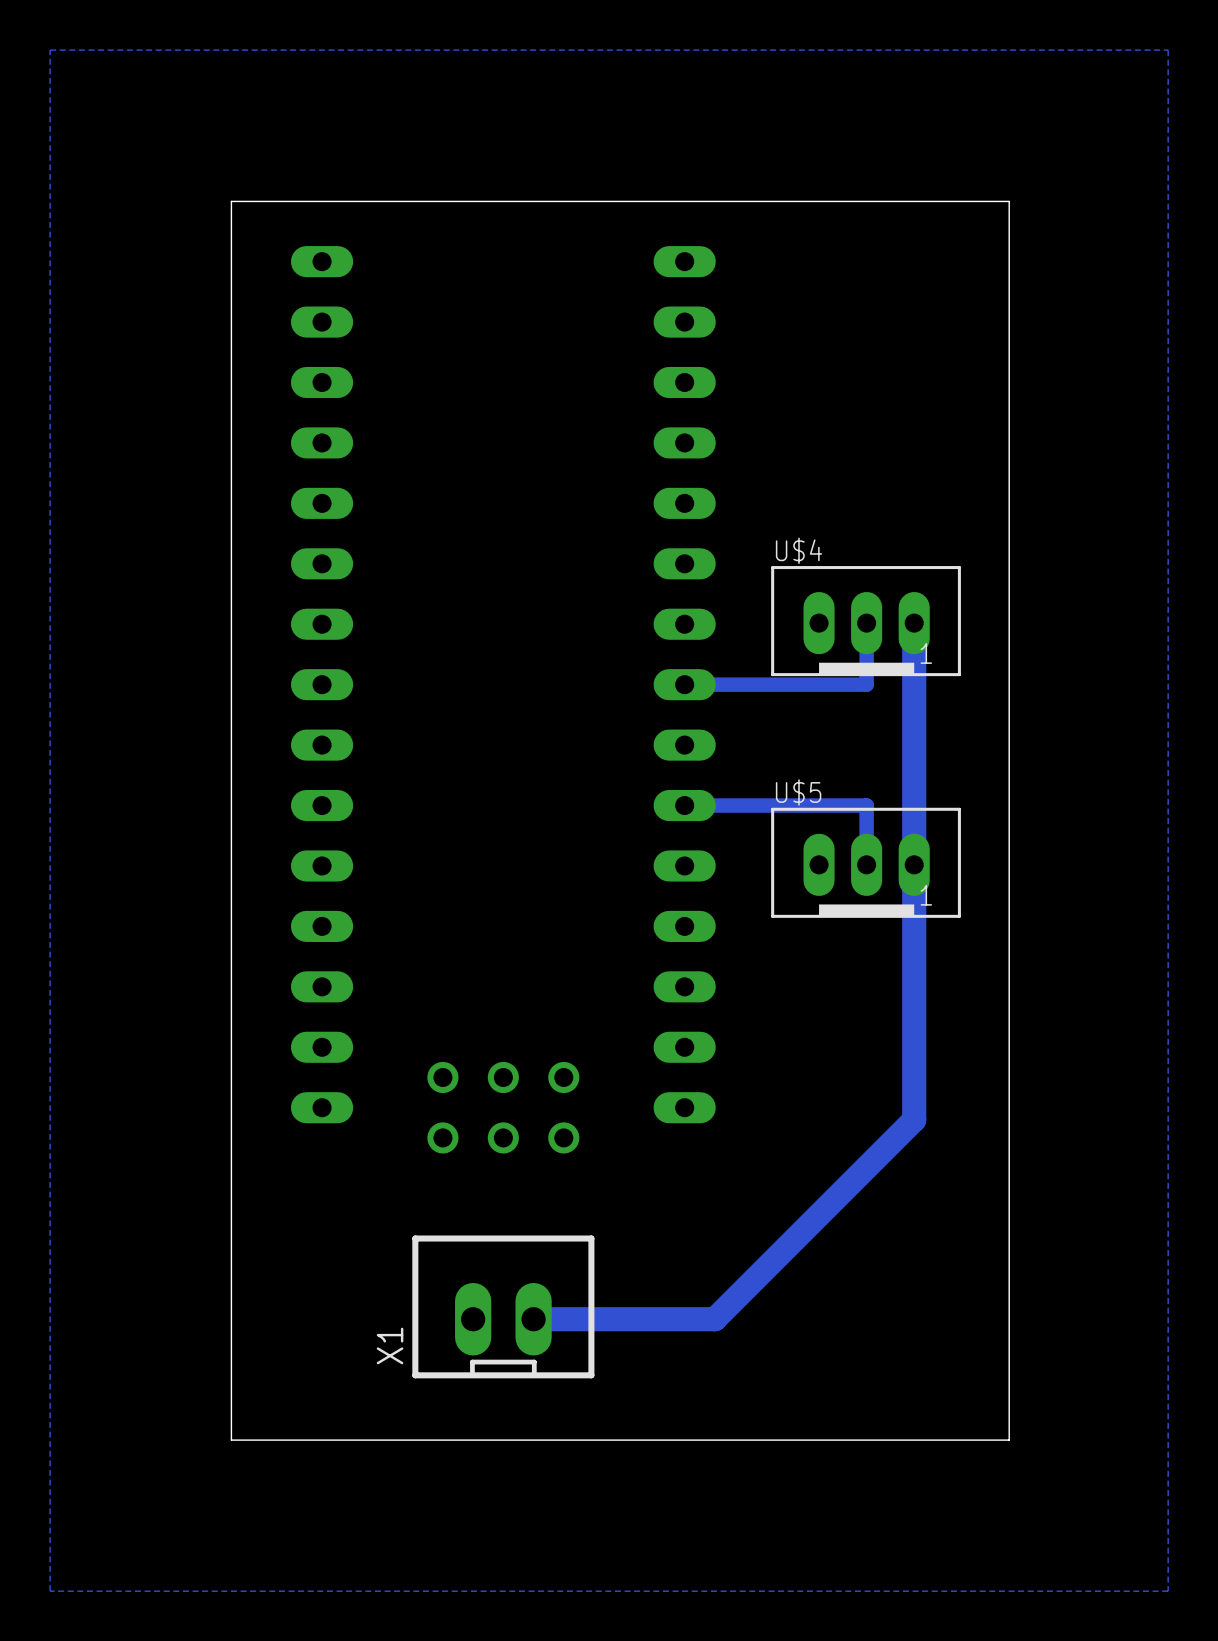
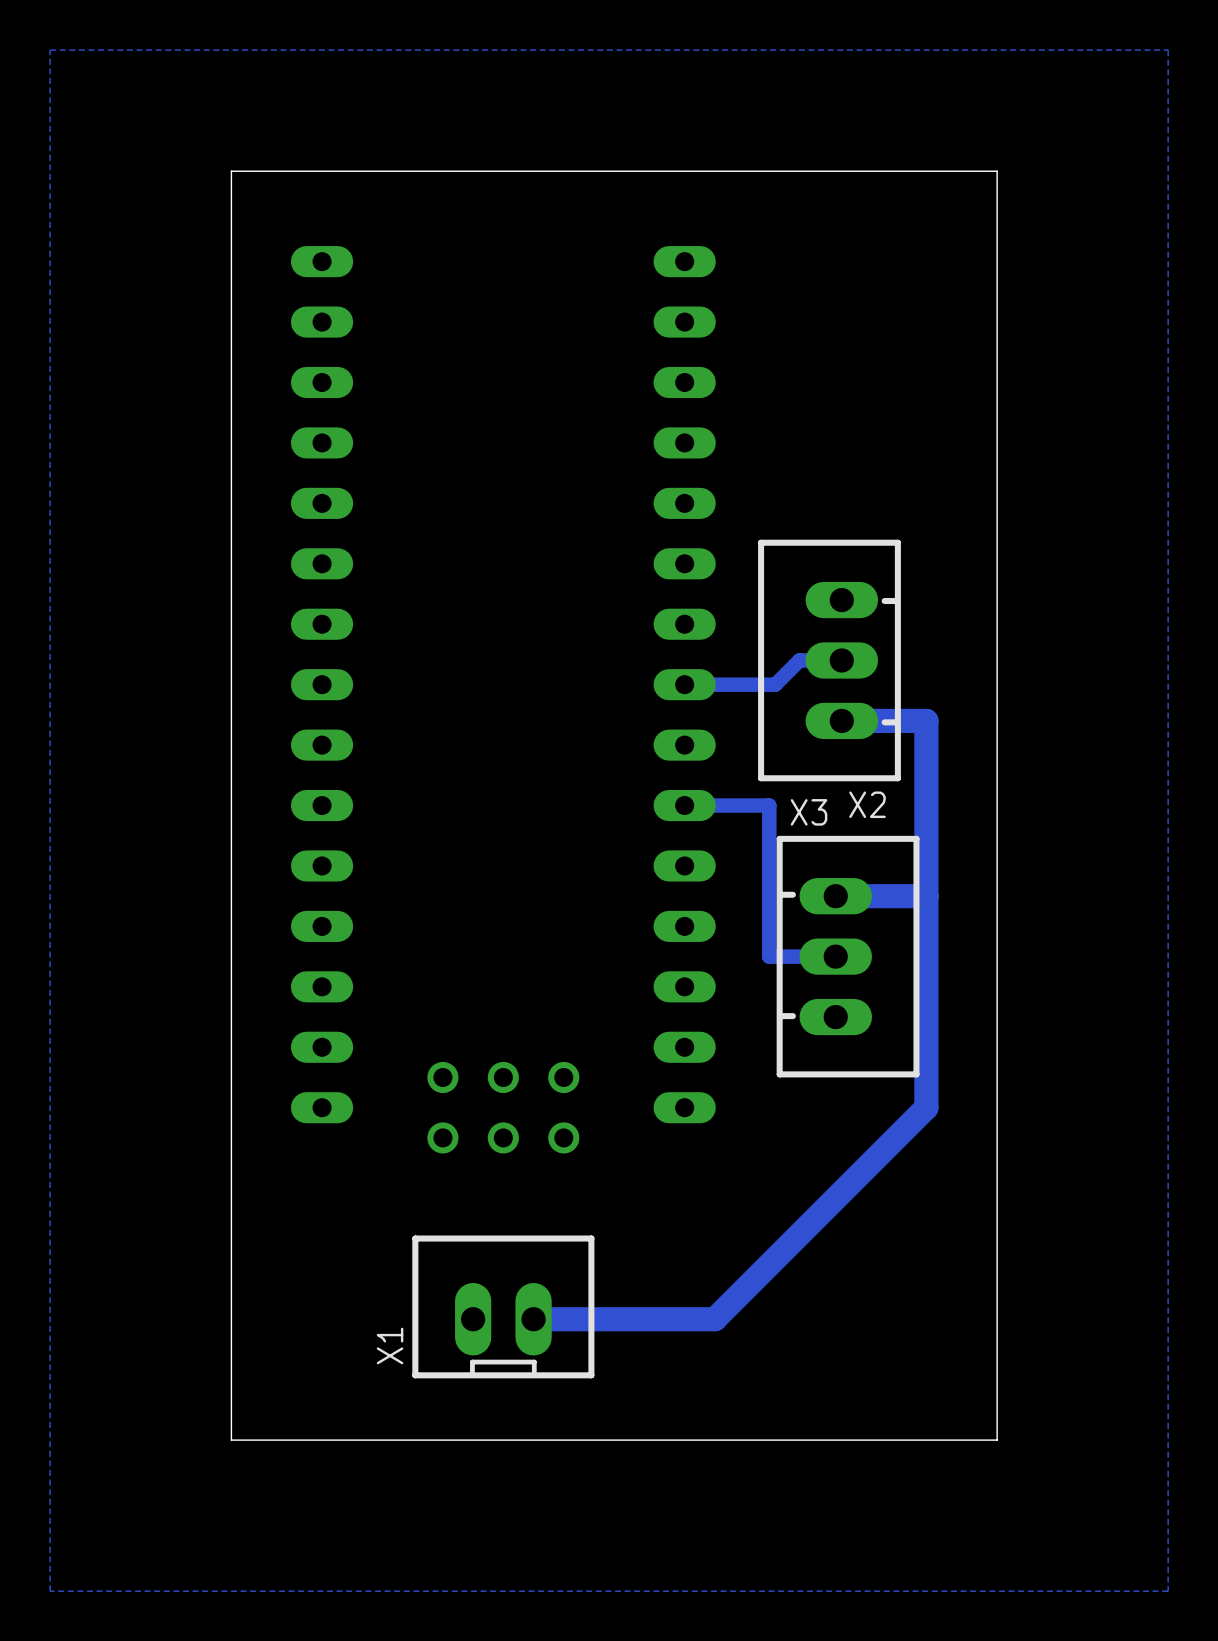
board edge: (231, 201) (1009, 201) (1009, 1440) (997, 1440) -> (231, 201) (231, 171) (997, 171) (997, 1440)
U$4: (866, 621) -> none
bottom track: (866, 623) (866, 684) (775, 684) -> (841, 660) (799, 660) (775, 684)
bottom track: (914, 623) (914, 1119) -> (841, 720) (926, 720) (926, 1107) (914, 1119)
X2: none -> (829, 660)
bottom track: (769, 805) (866, 805) (866, 864) -> (769, 805) (769, 956) (835, 956)
U$5: (866, 862) -> none
bottom track: none -> (835, 896) (926, 896)
X3: none -> (848, 956)

